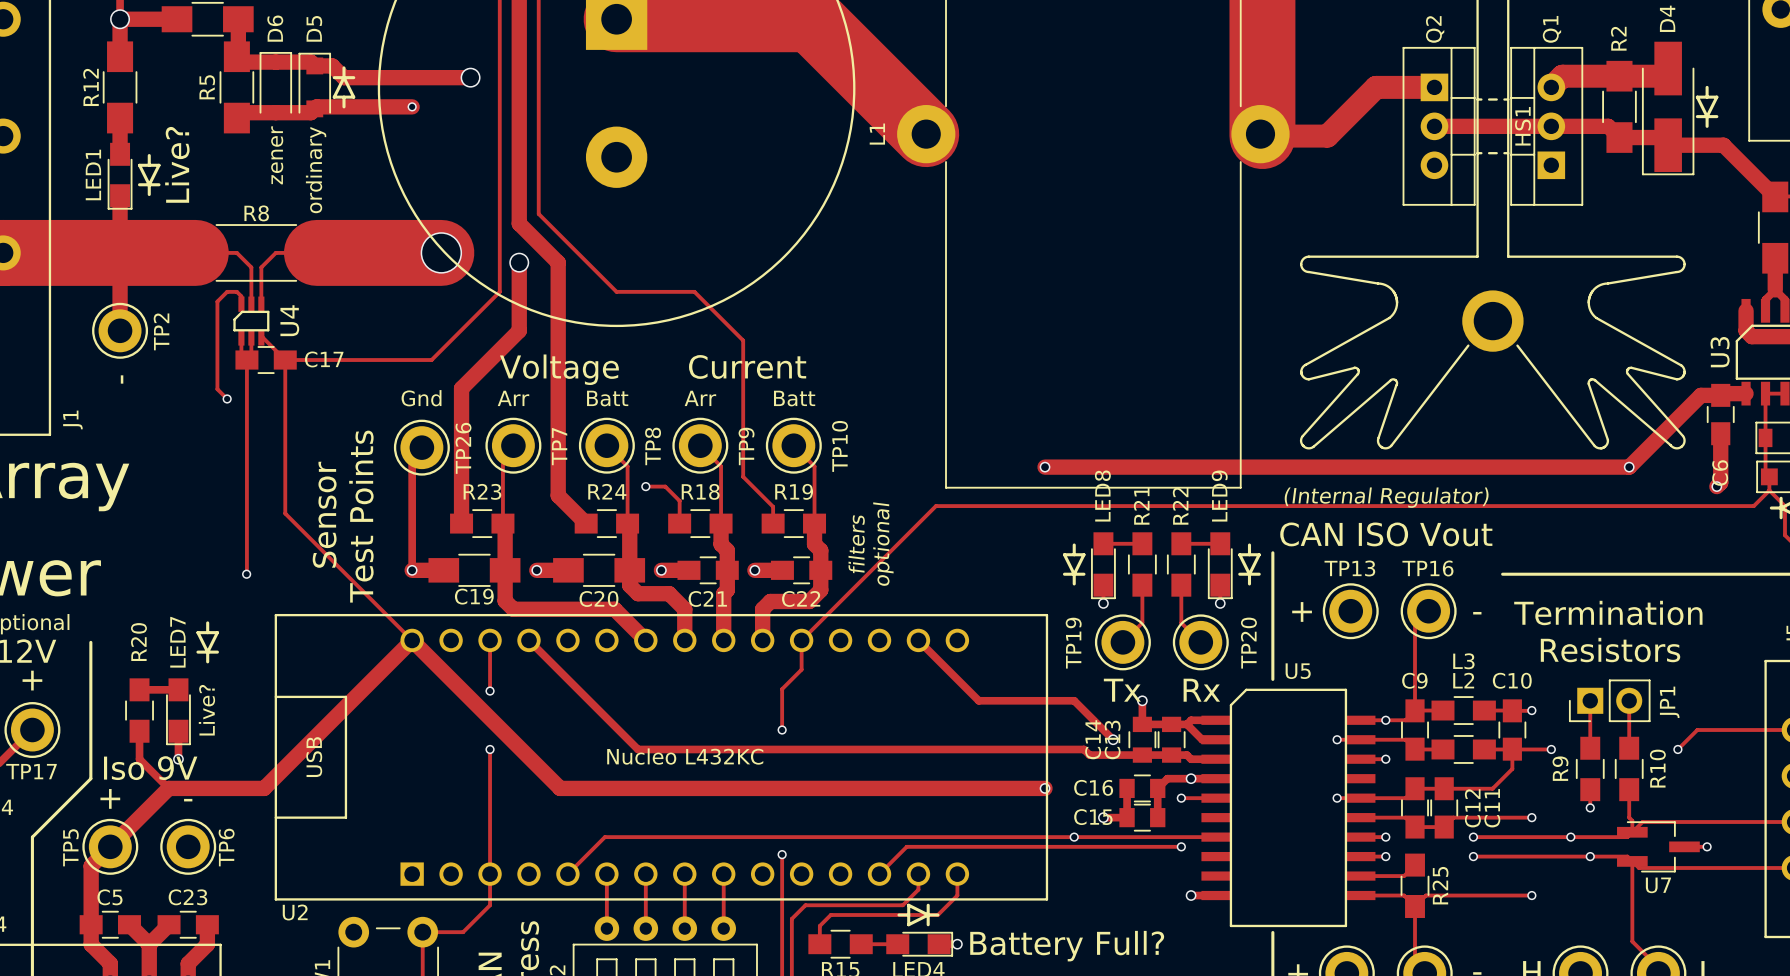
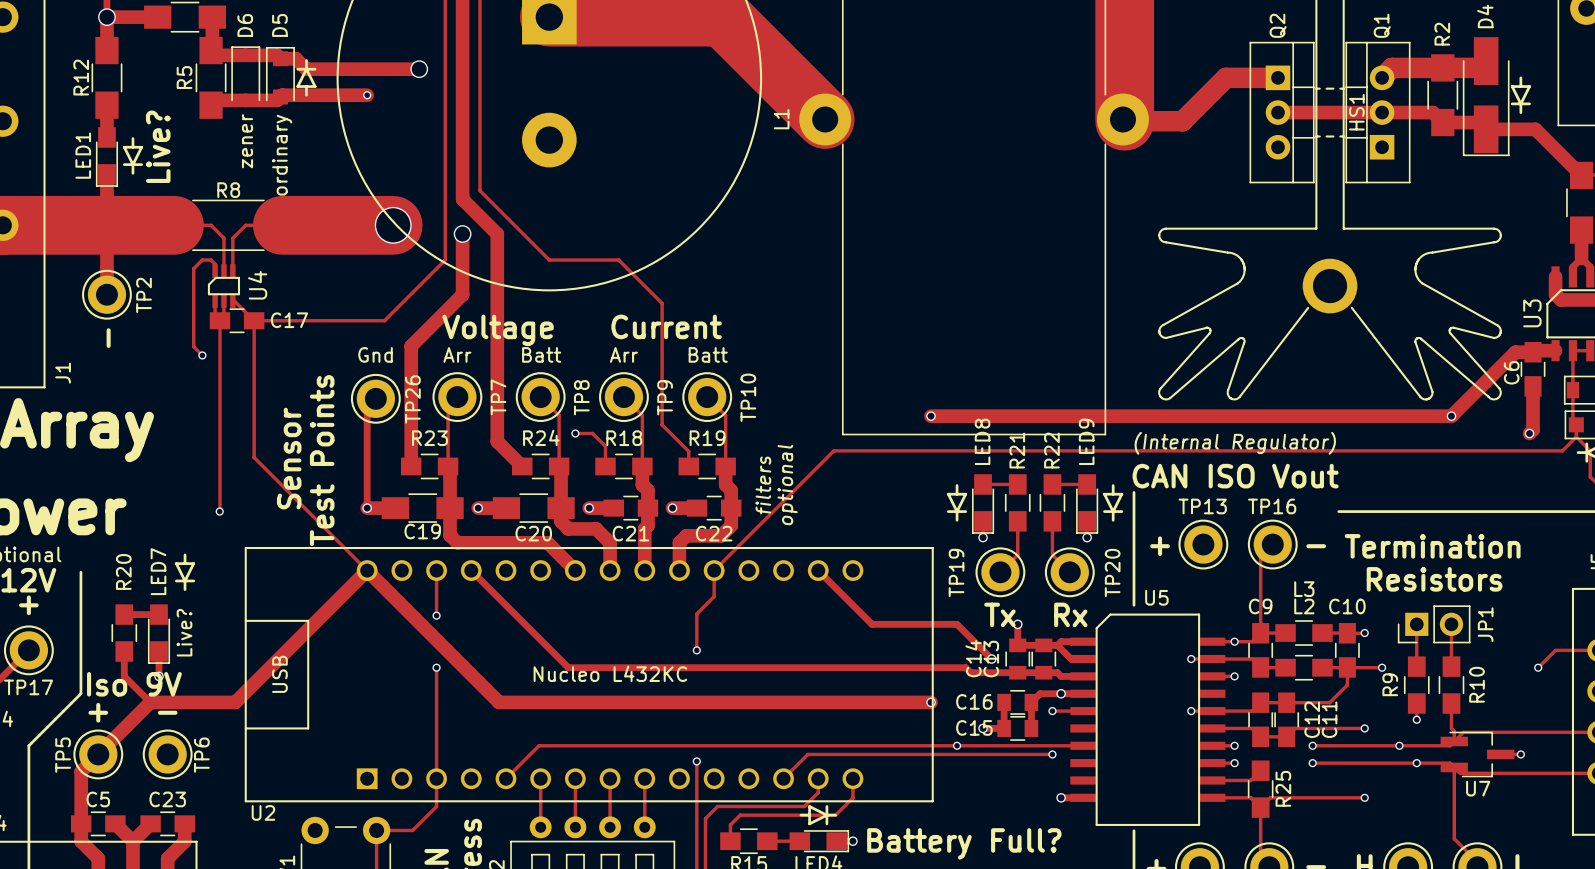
C6 name position: C6 (1720, 473) -> C6 (1511, 372)
track: (1746, 730) (1697, 730) (1677, 749) -> (1555, 650) (1538, 667)
via position: (1677, 749) -> (1538, 667)

